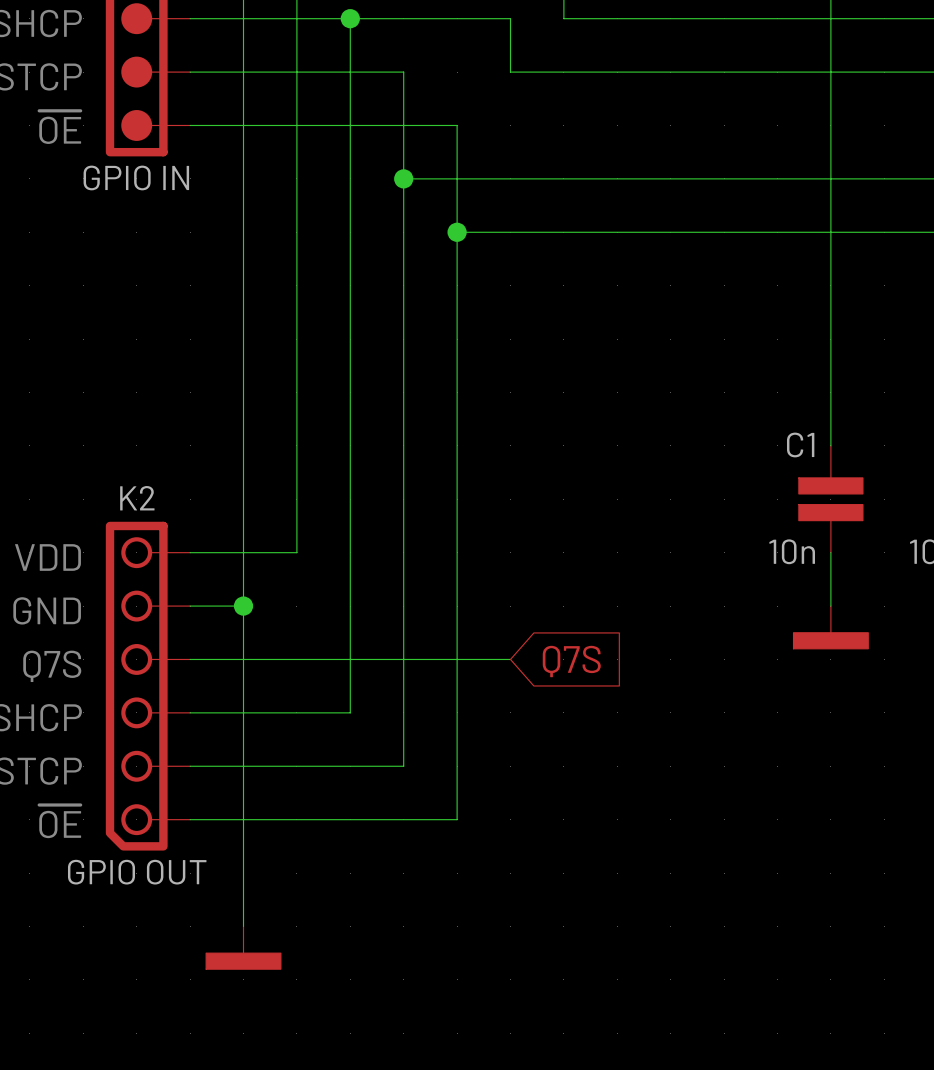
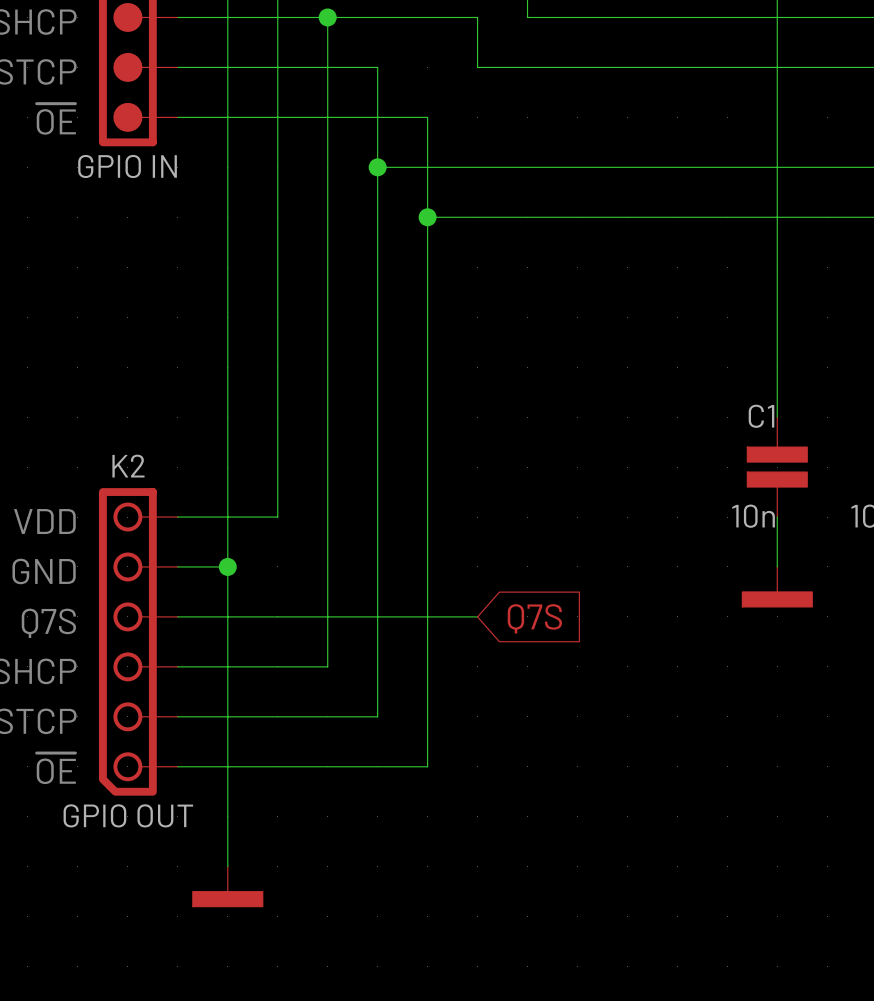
C1 name position: C1 (800, 444) -> C1 (761, 416)
C1 value position: 10n (792, 551) -> 10n (753, 516)

